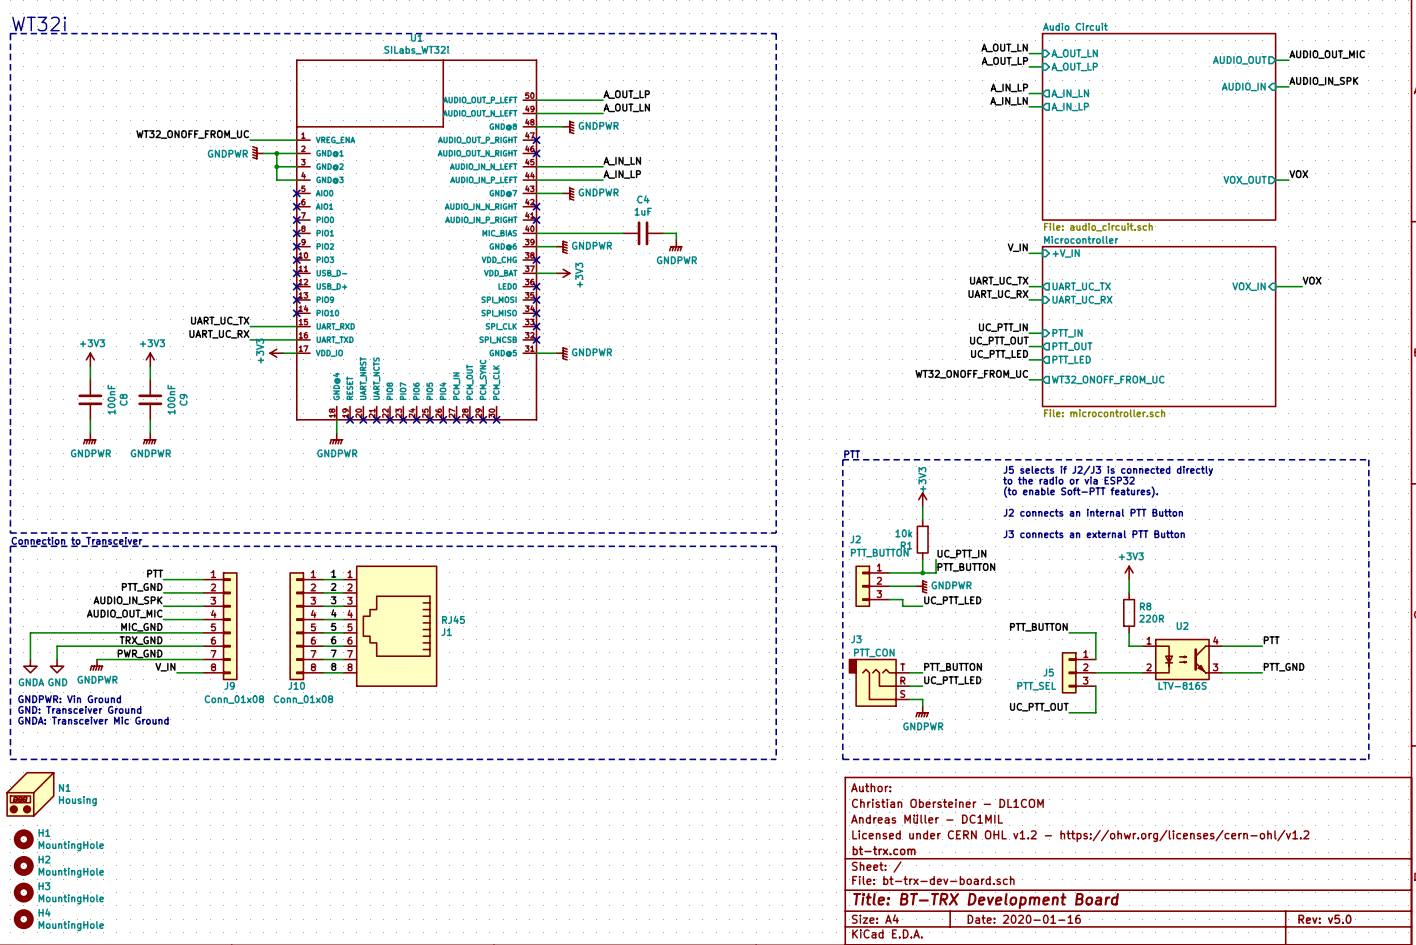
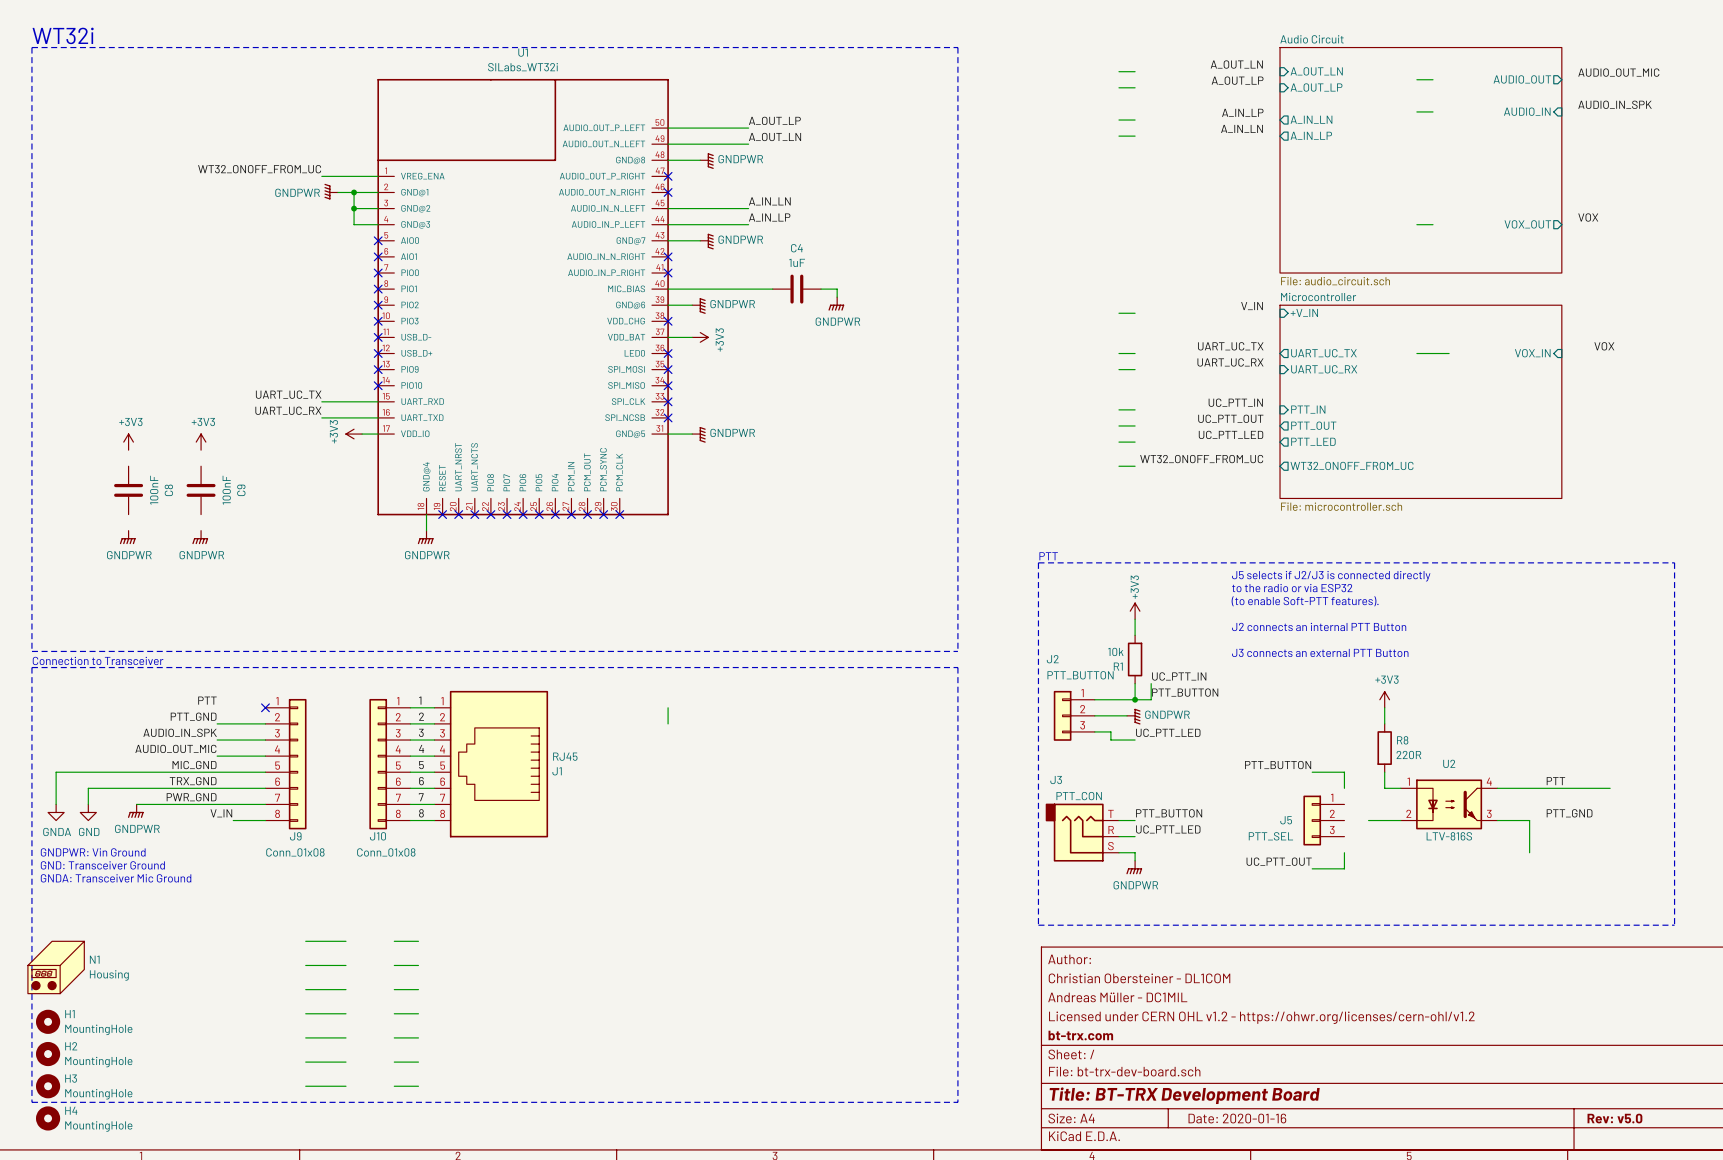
wire: (1029, 53) (1042, 53) -> (1118, 71) (1135, 71)
wire: (1275, 60) (1288, 60) -> (1416, 79) (1433, 79)
wire: (1029, 66) (1042, 66) -> (1118, 87) (1135, 87)
wire: (1275, 86) (1288, 86) -> (1416, 111) (1433, 111)
wire: (1029, 93) (1042, 93) -> (1118, 120) (1135, 120)
wire: (1029, 106) (1042, 106) -> (1118, 136) (1135, 136)
wire: (1275, 180) (1288, 180) -> (1416, 224) (1433, 224)
wire: (1029, 253) (1042, 253) -> (1118, 313) (1135, 313)
wire: (1029, 286) (1042, 286) -> (1118, 353) (1135, 353)
wire: (1275, 286) (1302, 286) -> (1416, 353) (1449, 353)
wire: (1029, 299) (1042, 299) -> (1118, 369) (1135, 369)
wire: (1029, 333) (1042, 333) -> (1118, 409) (1135, 409)
wire: (1029, 346) (1042, 346) -> (1118, 425) (1135, 425)
wire: (1029, 359) (1042, 359) -> (1118, 442) (1135, 442)
wire: (90, 366) (90, 379) -> none
wire: (150, 366) (150, 379) -> none
wire: (1029, 379) (1042, 379) -> (1118, 466) (1135, 466)
wire: (90, 419) (90, 433) -> none
wire: (150, 419) (150, 433) -> none
wire: (163, 579) (203, 579) -> none
no-connect mark: none -> (265, 707)
wire: none -> (668, 707) (668, 723)
wire: (1095, 646) (1095, 659) -> none
wire: none -> (1545, 788) (1610, 788)
wire: (1095, 672) (1115, 672) -> none
wire: (1248, 672) (1262, 672) -> (1529, 820) (1529, 852)
wire: (1095, 686) (1095, 699) -> none
line: (10, 759) (776, 759) -> (31, 925) (31, 1102) (957, 1102) (957, 925)
wire: none -> (305, 941) (345, 941)
wire: none -> (394, 941) (418, 941)
wire: none -> (305, 965) (345, 965)
wire: none -> (394, 965) (418, 965)
wire: none -> (305, 989) (345, 989)
wire: none -> (394, 989) (418, 989)
wire: none -> (305, 1013) (345, 1013)
wire: none -> (394, 1013) (418, 1013)
wire: none -> (305, 1037) (345, 1037)
wire: none -> (394, 1037) (418, 1037)
wire: none -> (305, 1062) (345, 1062)
wire: none -> (394, 1062) (418, 1062)
wire: none -> (305, 1086) (345, 1086)
wire: none -> (394, 1086) (418, 1086)

